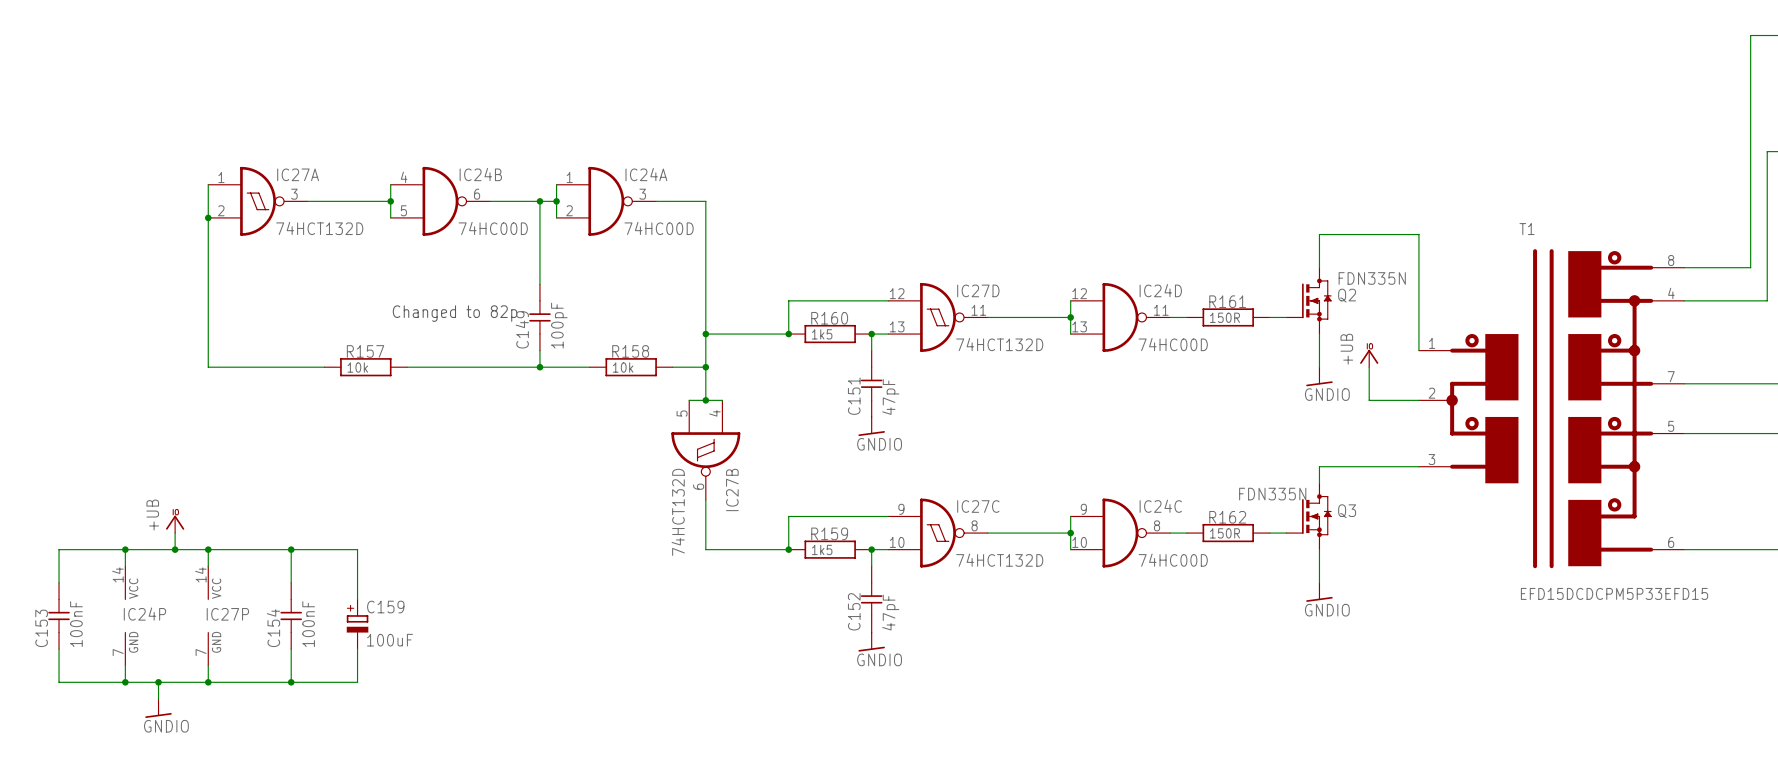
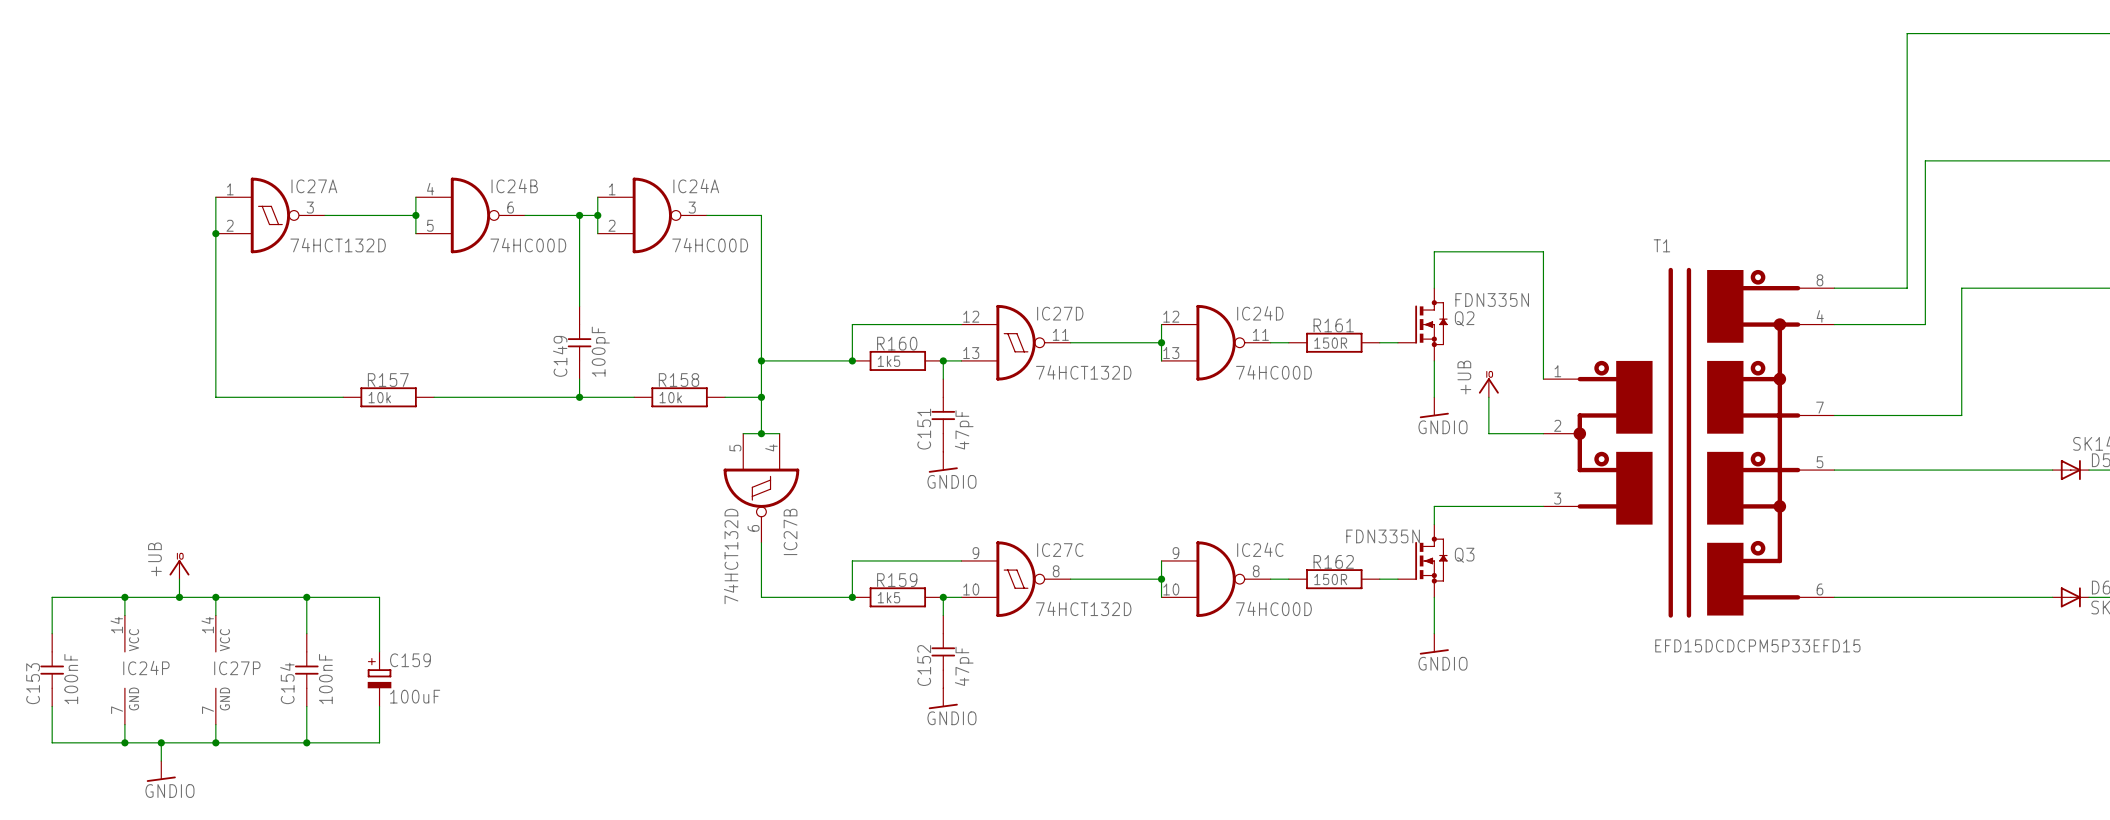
text: Changed to 82p (455, 313) -> none

